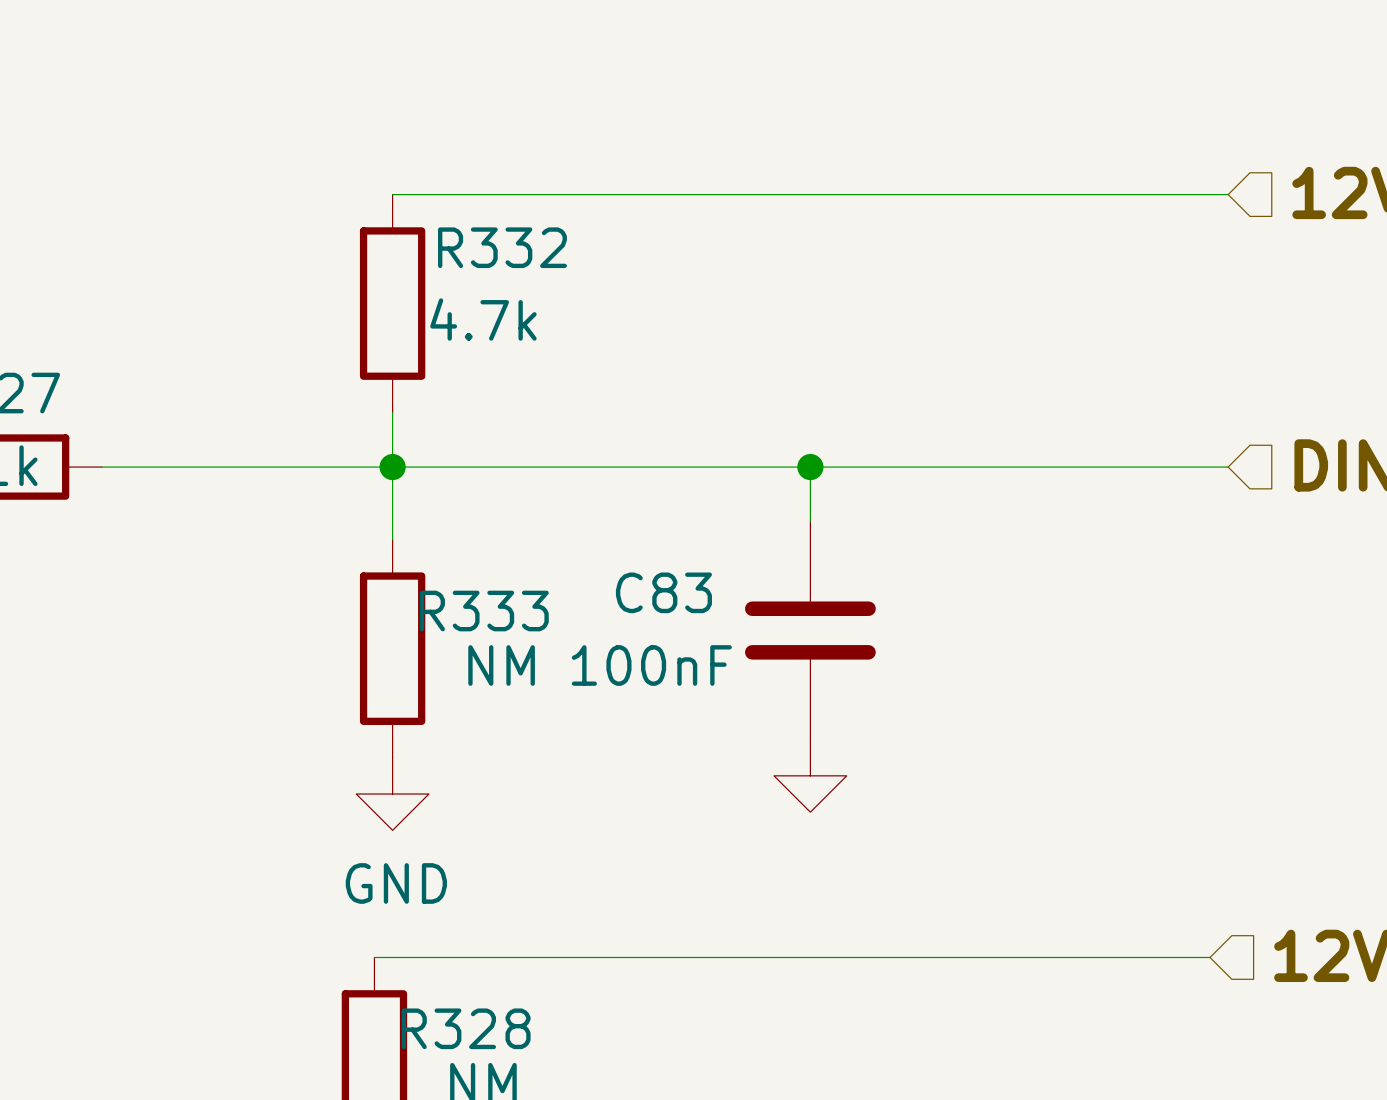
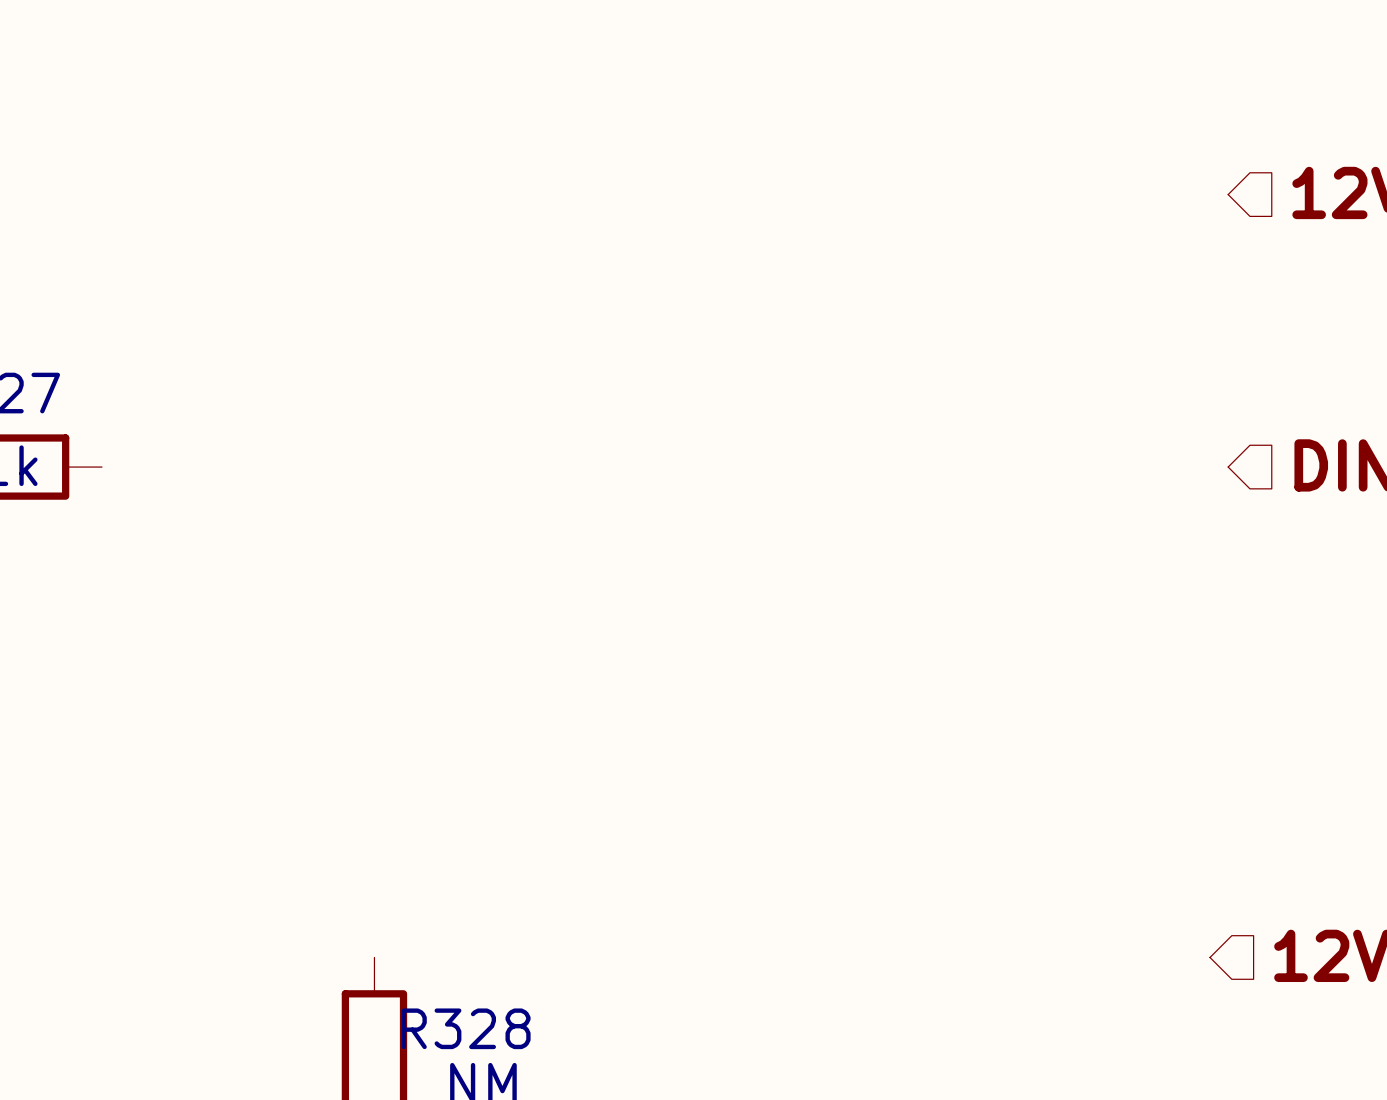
wire: (392, 194) (1228, 194) -> none
R332: 4.7k (392, 303) -> none
wire: (392, 412) (392, 539) -> none
wire: (101, 467) (1228, 467) -> none
junction: (392, 467) -> none
wire: (810, 467) (810, 521) -> none
junction: (810, 467) -> none
C83: 100nF (810, 630) -> none
R333: NM (392, 648) -> none
power symbol: (810, 775) -> none
power symbol: GND (392, 794) -> none
wire: (374, 957) (1210, 957) -> none

